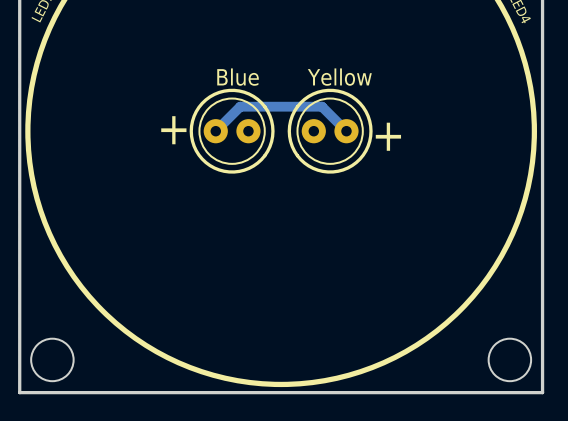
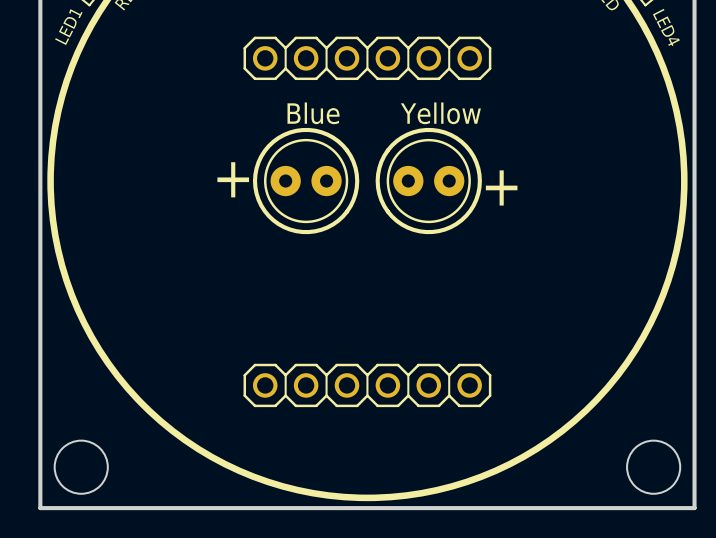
part: none -> (367, 58)
track: (346, 131) (321, 106) (240, 106) (215, 131) -> none
part: none -> (367, 385)

